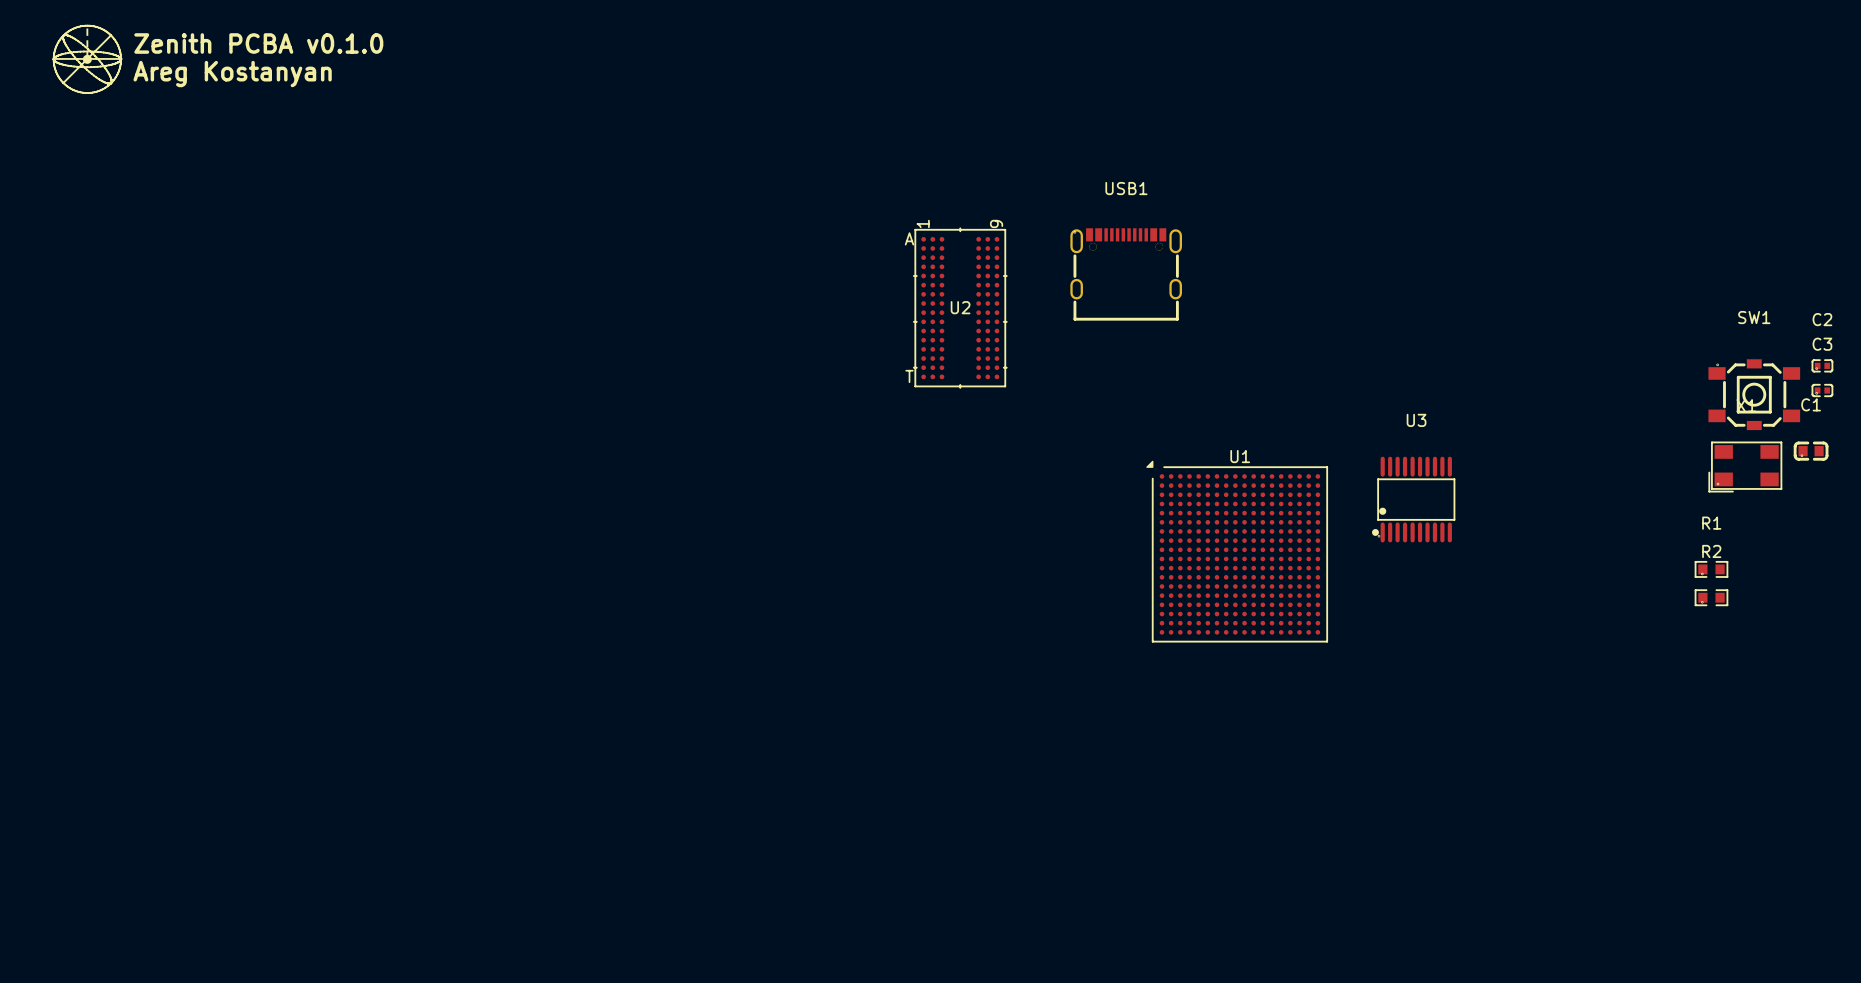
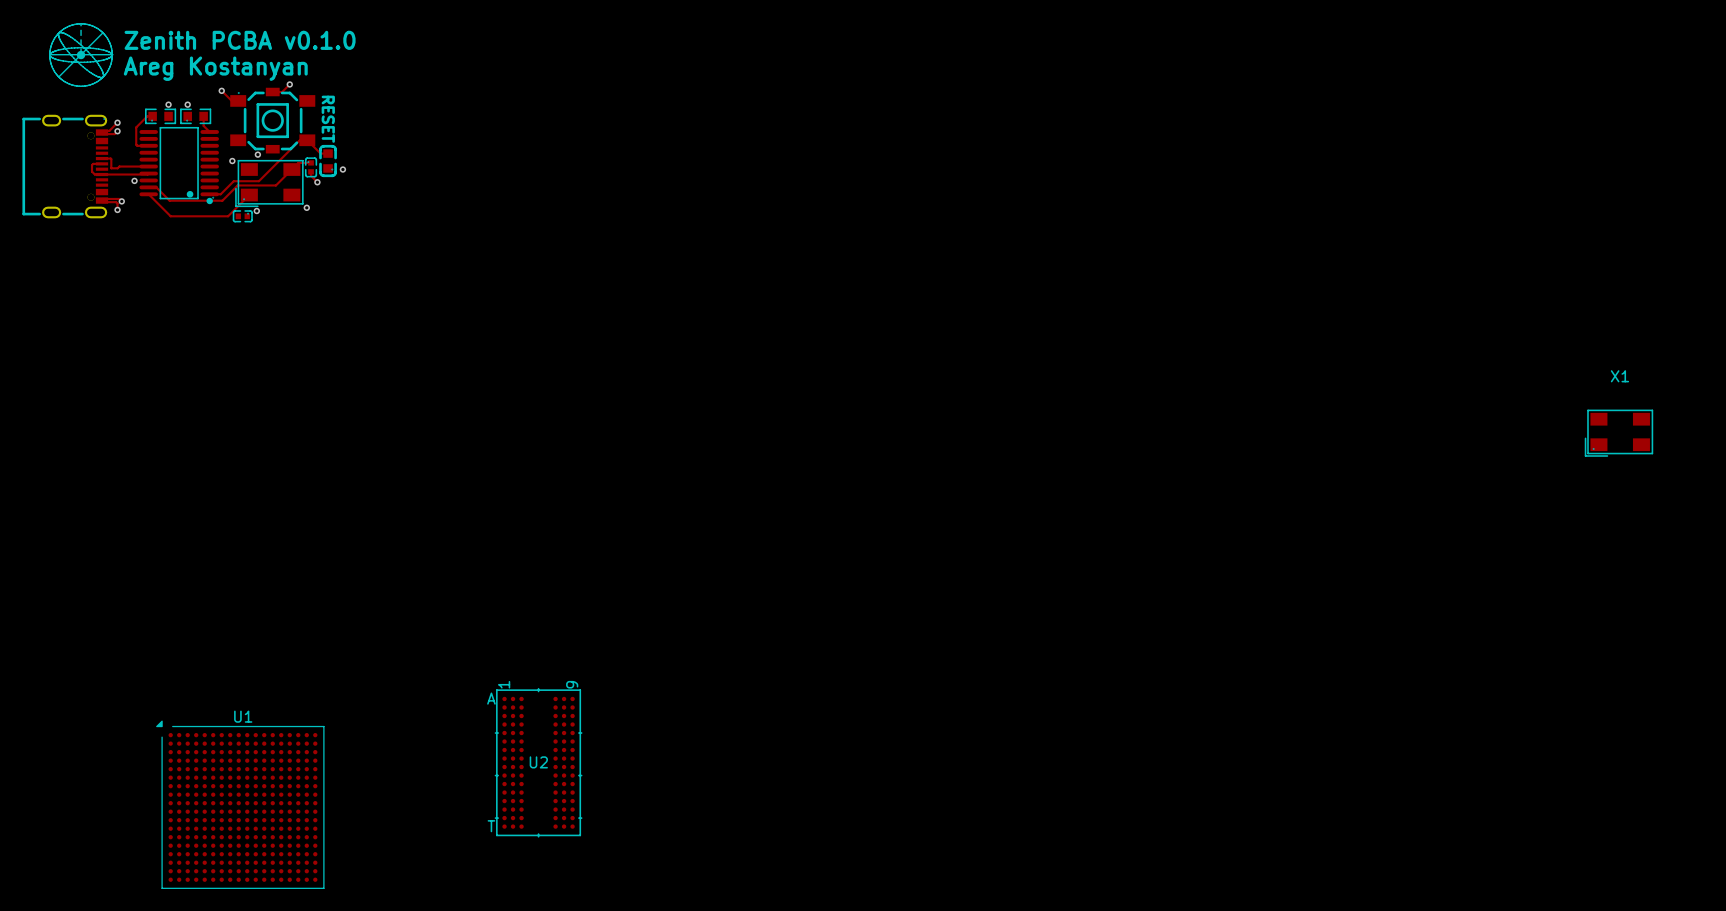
track: none -> (289, 84) (282, 92) (272, 92)
via: none -> (289, 84)
track: none -> (221, 90) (231, 100) (238, 100)
via: none -> (221, 90)
via: none -> (168, 104)
via: none -> (187, 104)
track: none -> (152, 116) (147, 116) (136, 127) (136, 144) (148, 145)
part: none -> (160, 116)
part: none -> (195, 116)
track: none -> (203, 116) (203, 125) (209, 131)
text: none -> RESET (328, 119)
part: none -> (272, 120)
track: none -> (117, 122) (109, 130) (102, 130)
via: none -> (117, 122)
track: none -> (117, 131) (114, 134) (102, 134)
via: none -> (117, 131)
track: none -> (328, 153) (320, 153) (307, 140) (299, 140) (258, 181) (233, 181) (220, 194) (209, 194)
via: none -> (257, 154)
track: none -> (102, 158) (111, 159) (111, 168) (148, 166)
via: none -> (232, 161)
part: none -> (328, 161)
track: none -> (311, 162) (298, 162) (275, 185) (237, 185) (222, 200) (169, 200) (156, 187) (148, 187)
track: none -> (102, 163) (92, 165) (92, 171) (94, 174) (148, 173)
part: none -> (179, 165)
part: none -> (65, 166)
part: none -> (311, 167)
via: none -> (342, 169)
track: none -> (311, 171) (311, 175) (317, 182)
via: none -> (134, 180)
via: none -> (317, 182)
part: none -> (269, 183)
track: none -> (148, 194) (170, 216) (228, 216) (249, 195)
track: none -> (102, 198) (119, 198) (121, 201)
track: none -> (102, 202) (116, 202) (117, 209)
via: none -> (121, 201)
via: none -> (306, 207)
via: none -> (117, 209)
via: none -> (256, 210)
part: none -> (242, 216)
USB1: (1126, 274) -> none
U2 position: (960, 308) -> (538, 762)
C2: (1822, 365) -> none
C3: (1822, 390) -> none
SW1: (1754, 394) -> none
C1: (1811, 451) -> none
U3: (1413, 499) -> none
U1 position: (1237, 551) -> (240, 804)
R1: (1711, 569) -> none
R2: (1711, 597) -> none

